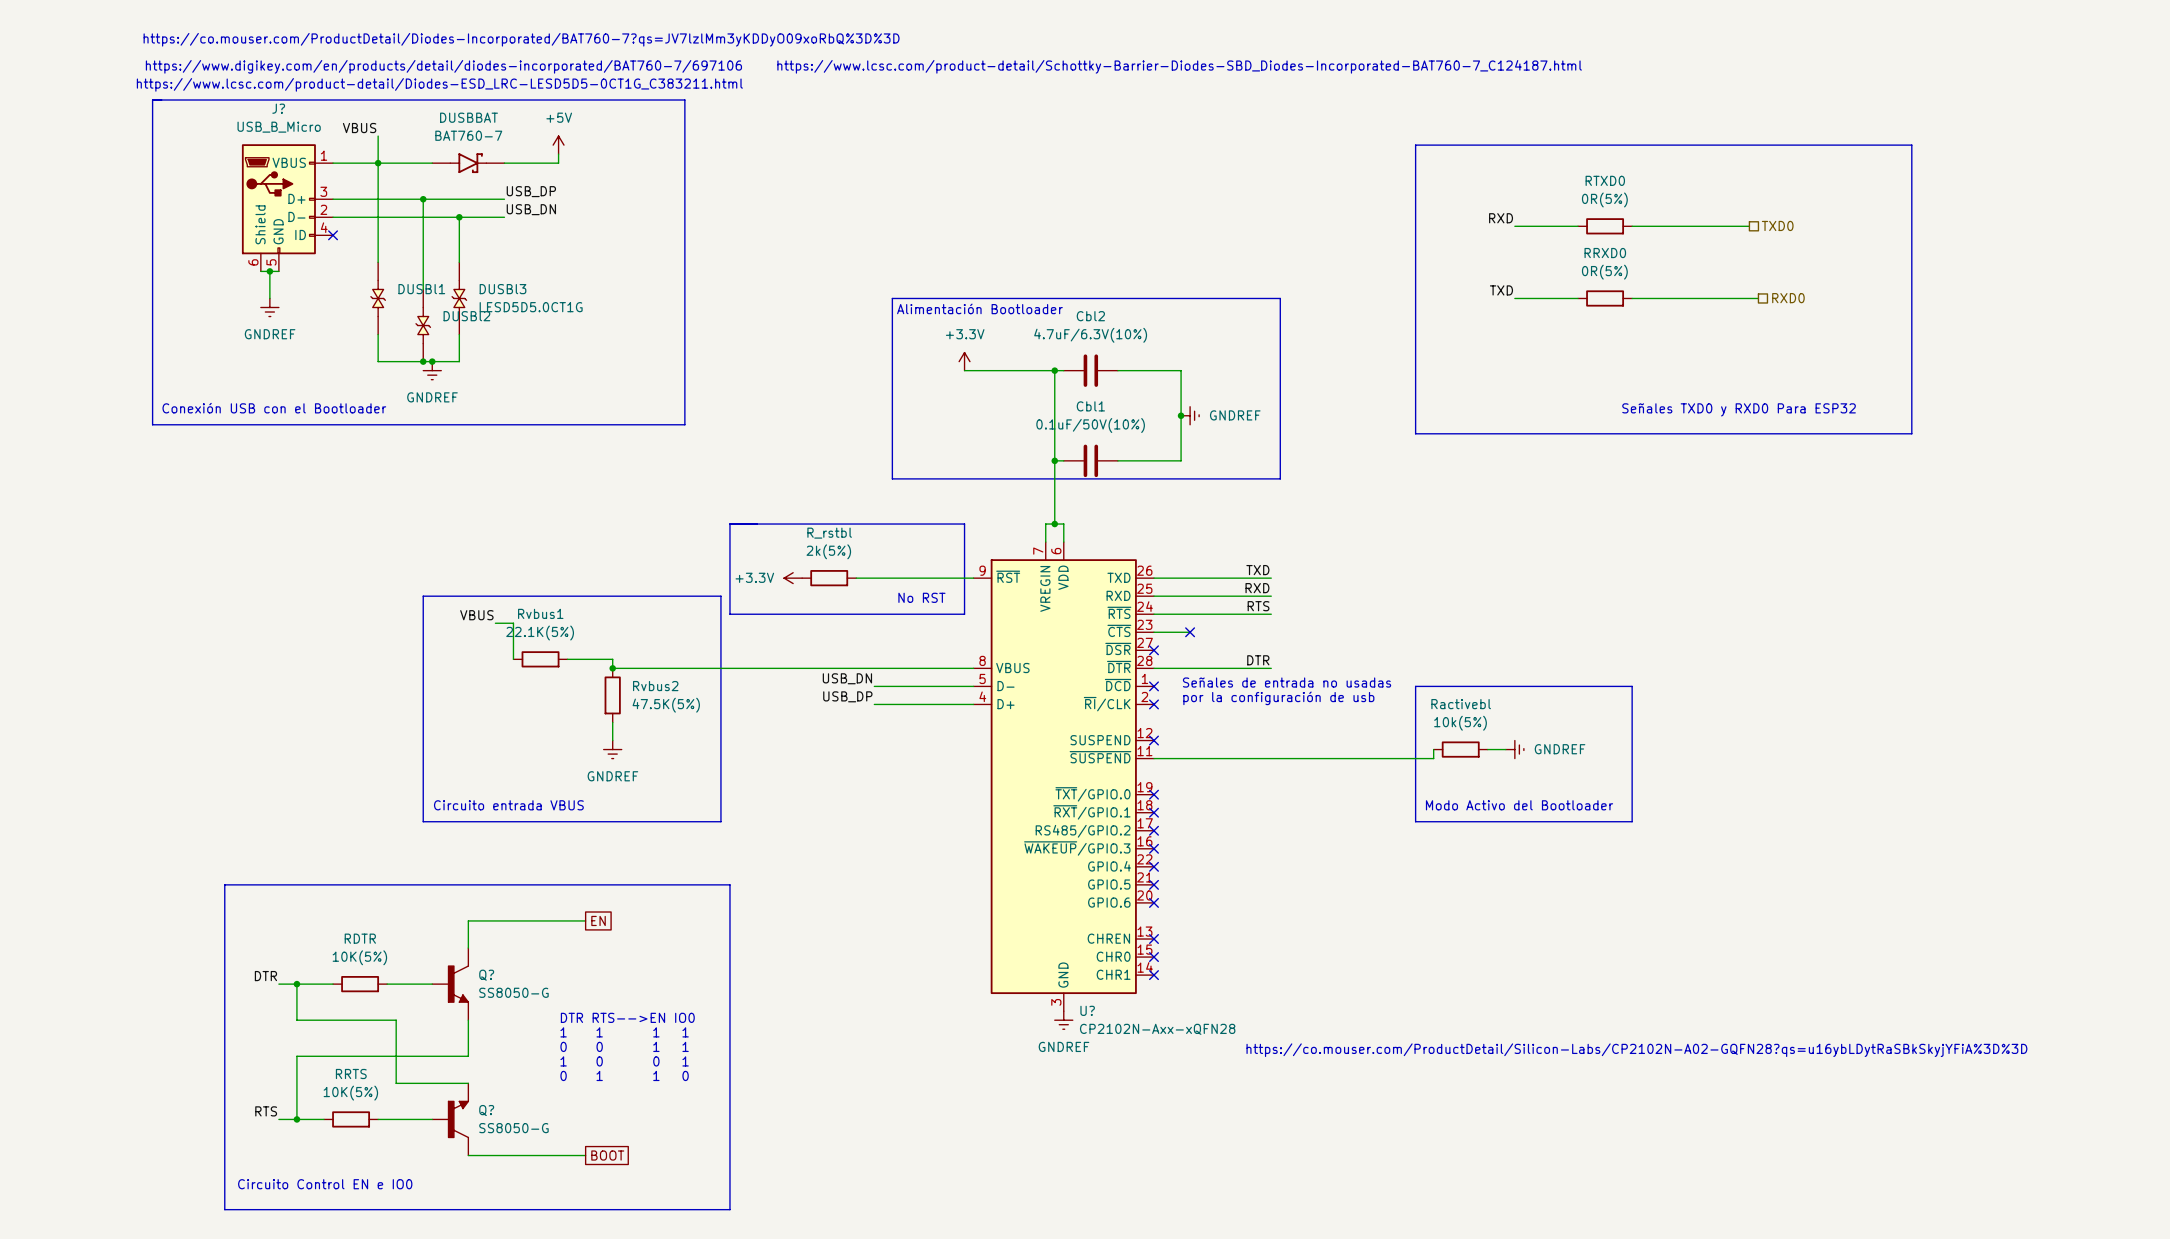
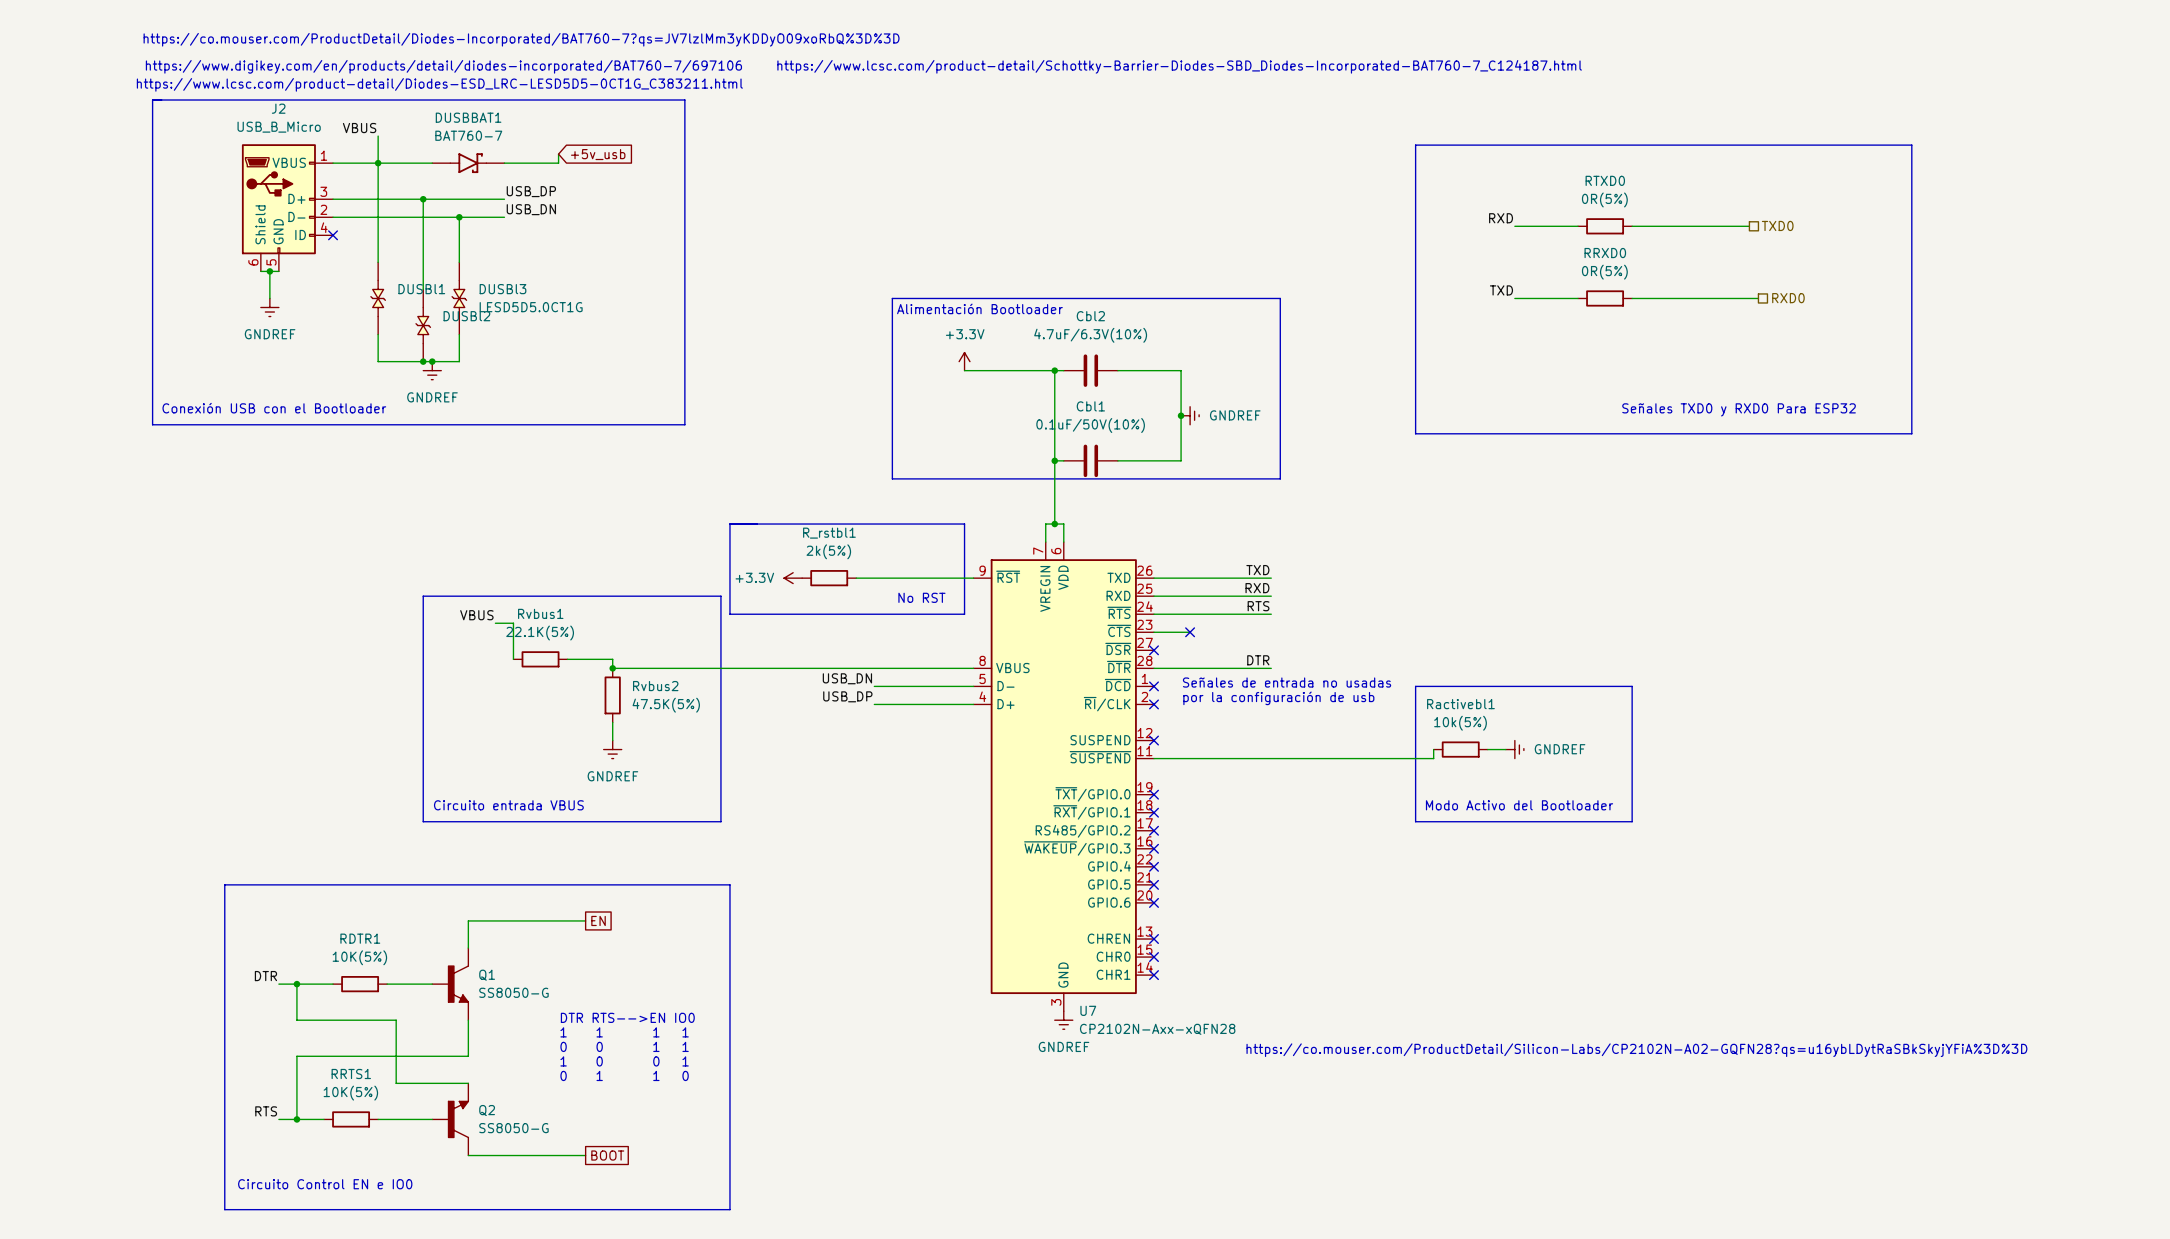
J? name: J? (278, 108) -> J2 (278, 108)
DUSBBAT name: DUSBBAT (469, 117) -> DUSBBAT1 (468, 117)
power symbol: +5V (558, 145) -> none
global label: none -> +5v_usb (598, 154)
R_rstbl name: R_rstbl (829, 533) -> R_rstbl1 (829, 533)
Ractivebl name: Ractivebl (1461, 704) -> Ractivebl1 (1460, 704)
RDTR name: RDTR (360, 938) -> RDTR1 (360, 938)
Q? name: Q? (486, 975) -> Q1 (487, 975)
U? name: U? (1087, 1010) -> U7 (1088, 1010)
RRTS name: RRTS (351, 1073) -> RRTS1 (351, 1073)
Q? name: Q? (486, 1110) -> Q2 (487, 1110)

